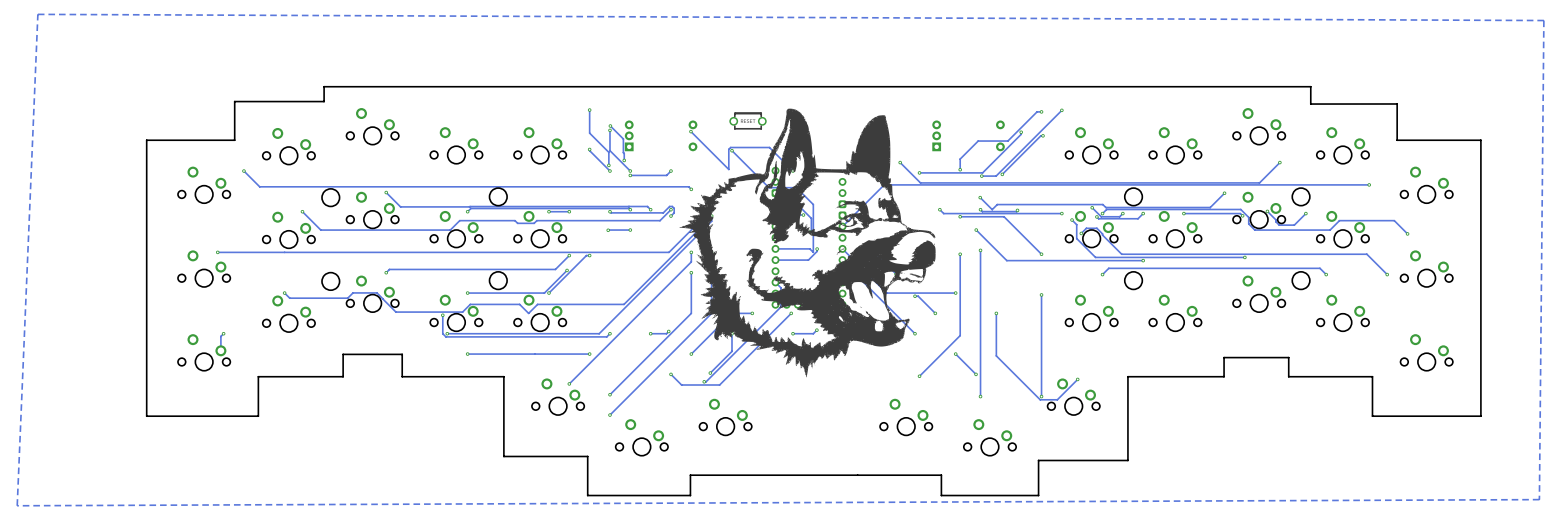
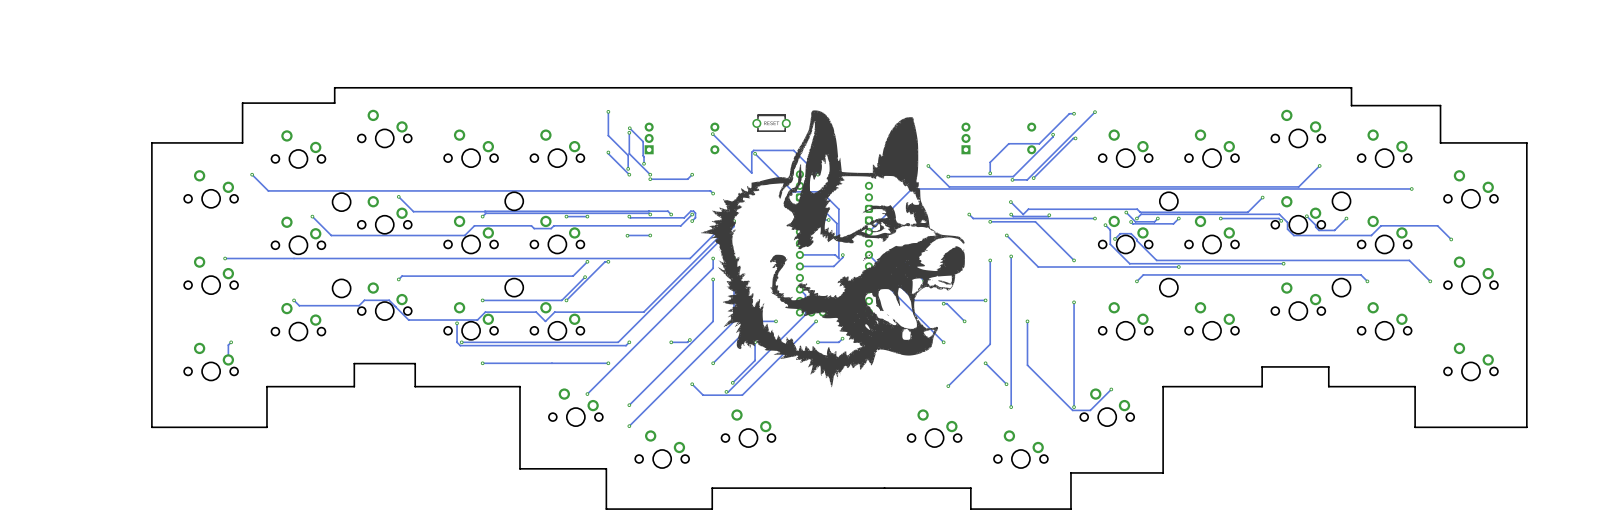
zone outline: (37, 14) (17, 505) (1539, 499) (1543, 20) (37, 14) -> none

